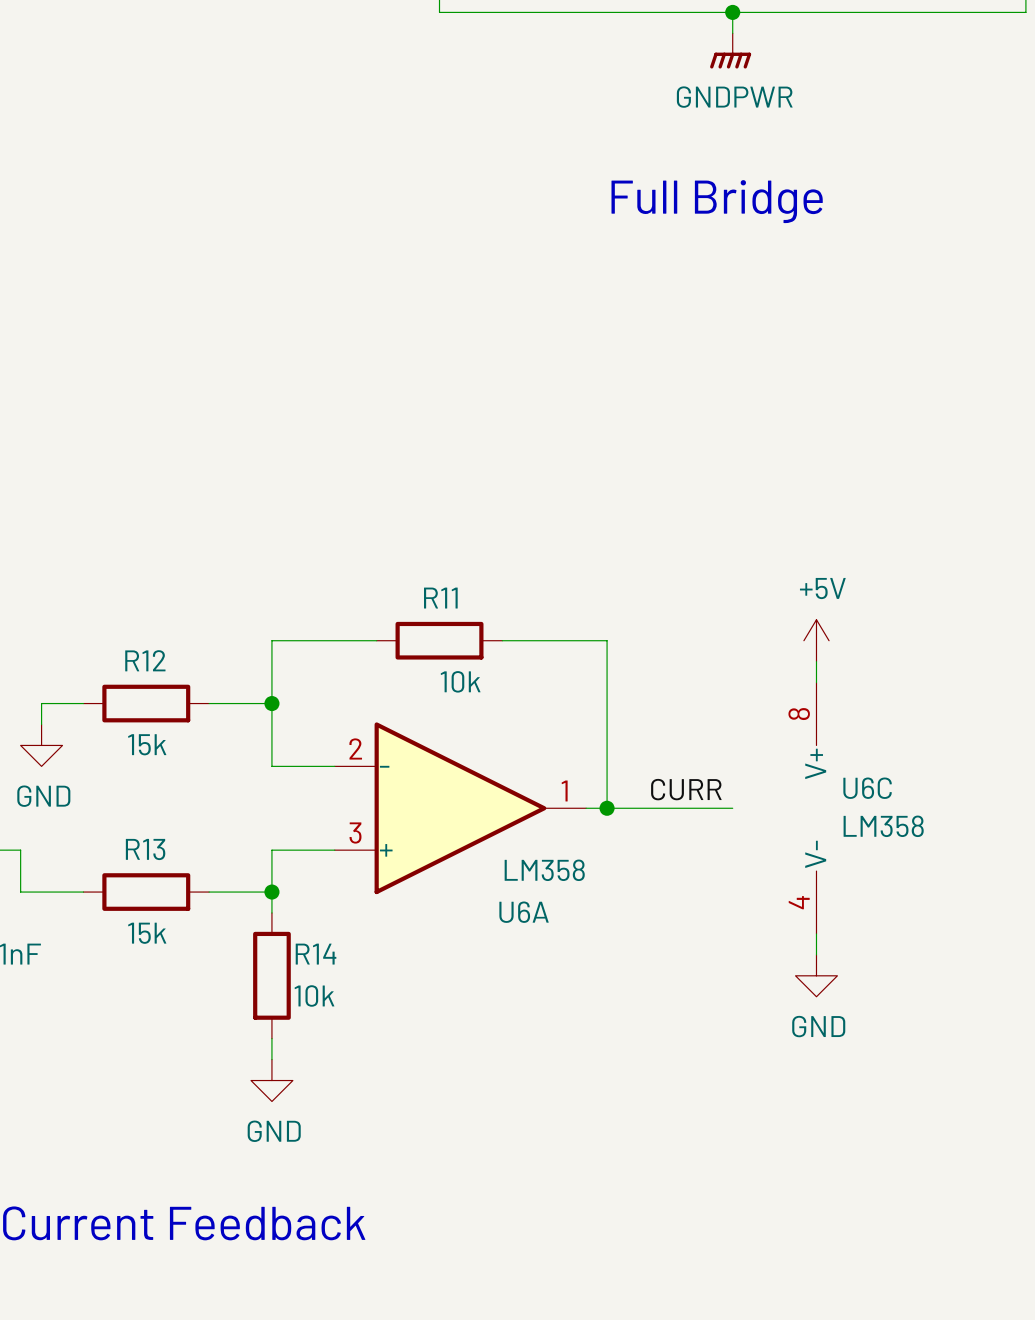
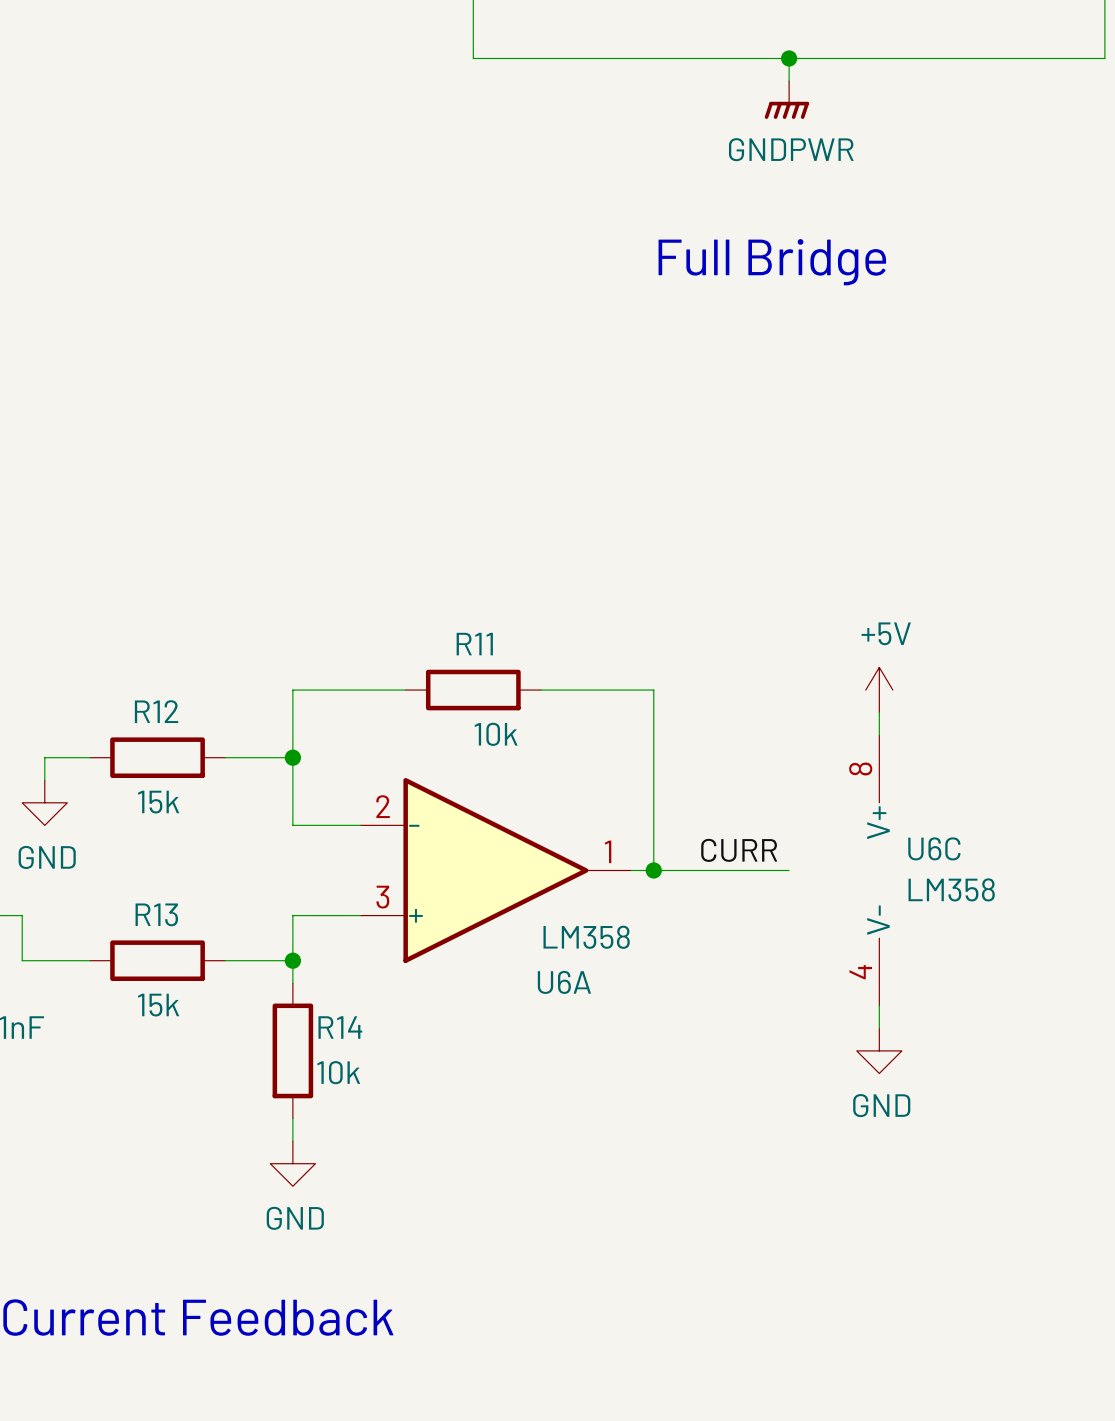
wire: (439, 12) (1025, 12) -> (473, 13) (473, 58) (1104, 58) (1104, 13)
wire: (732, 12) (732, 33) -> (789, 58) (789, 81)
junction position: (732, 12) -> (789, 58)
power symbol position: GNDPWR (730, 50) -> GNDPWR (786, 99)
text position: Full Bridge (717, 201) -> Full Bridge (772, 262)

